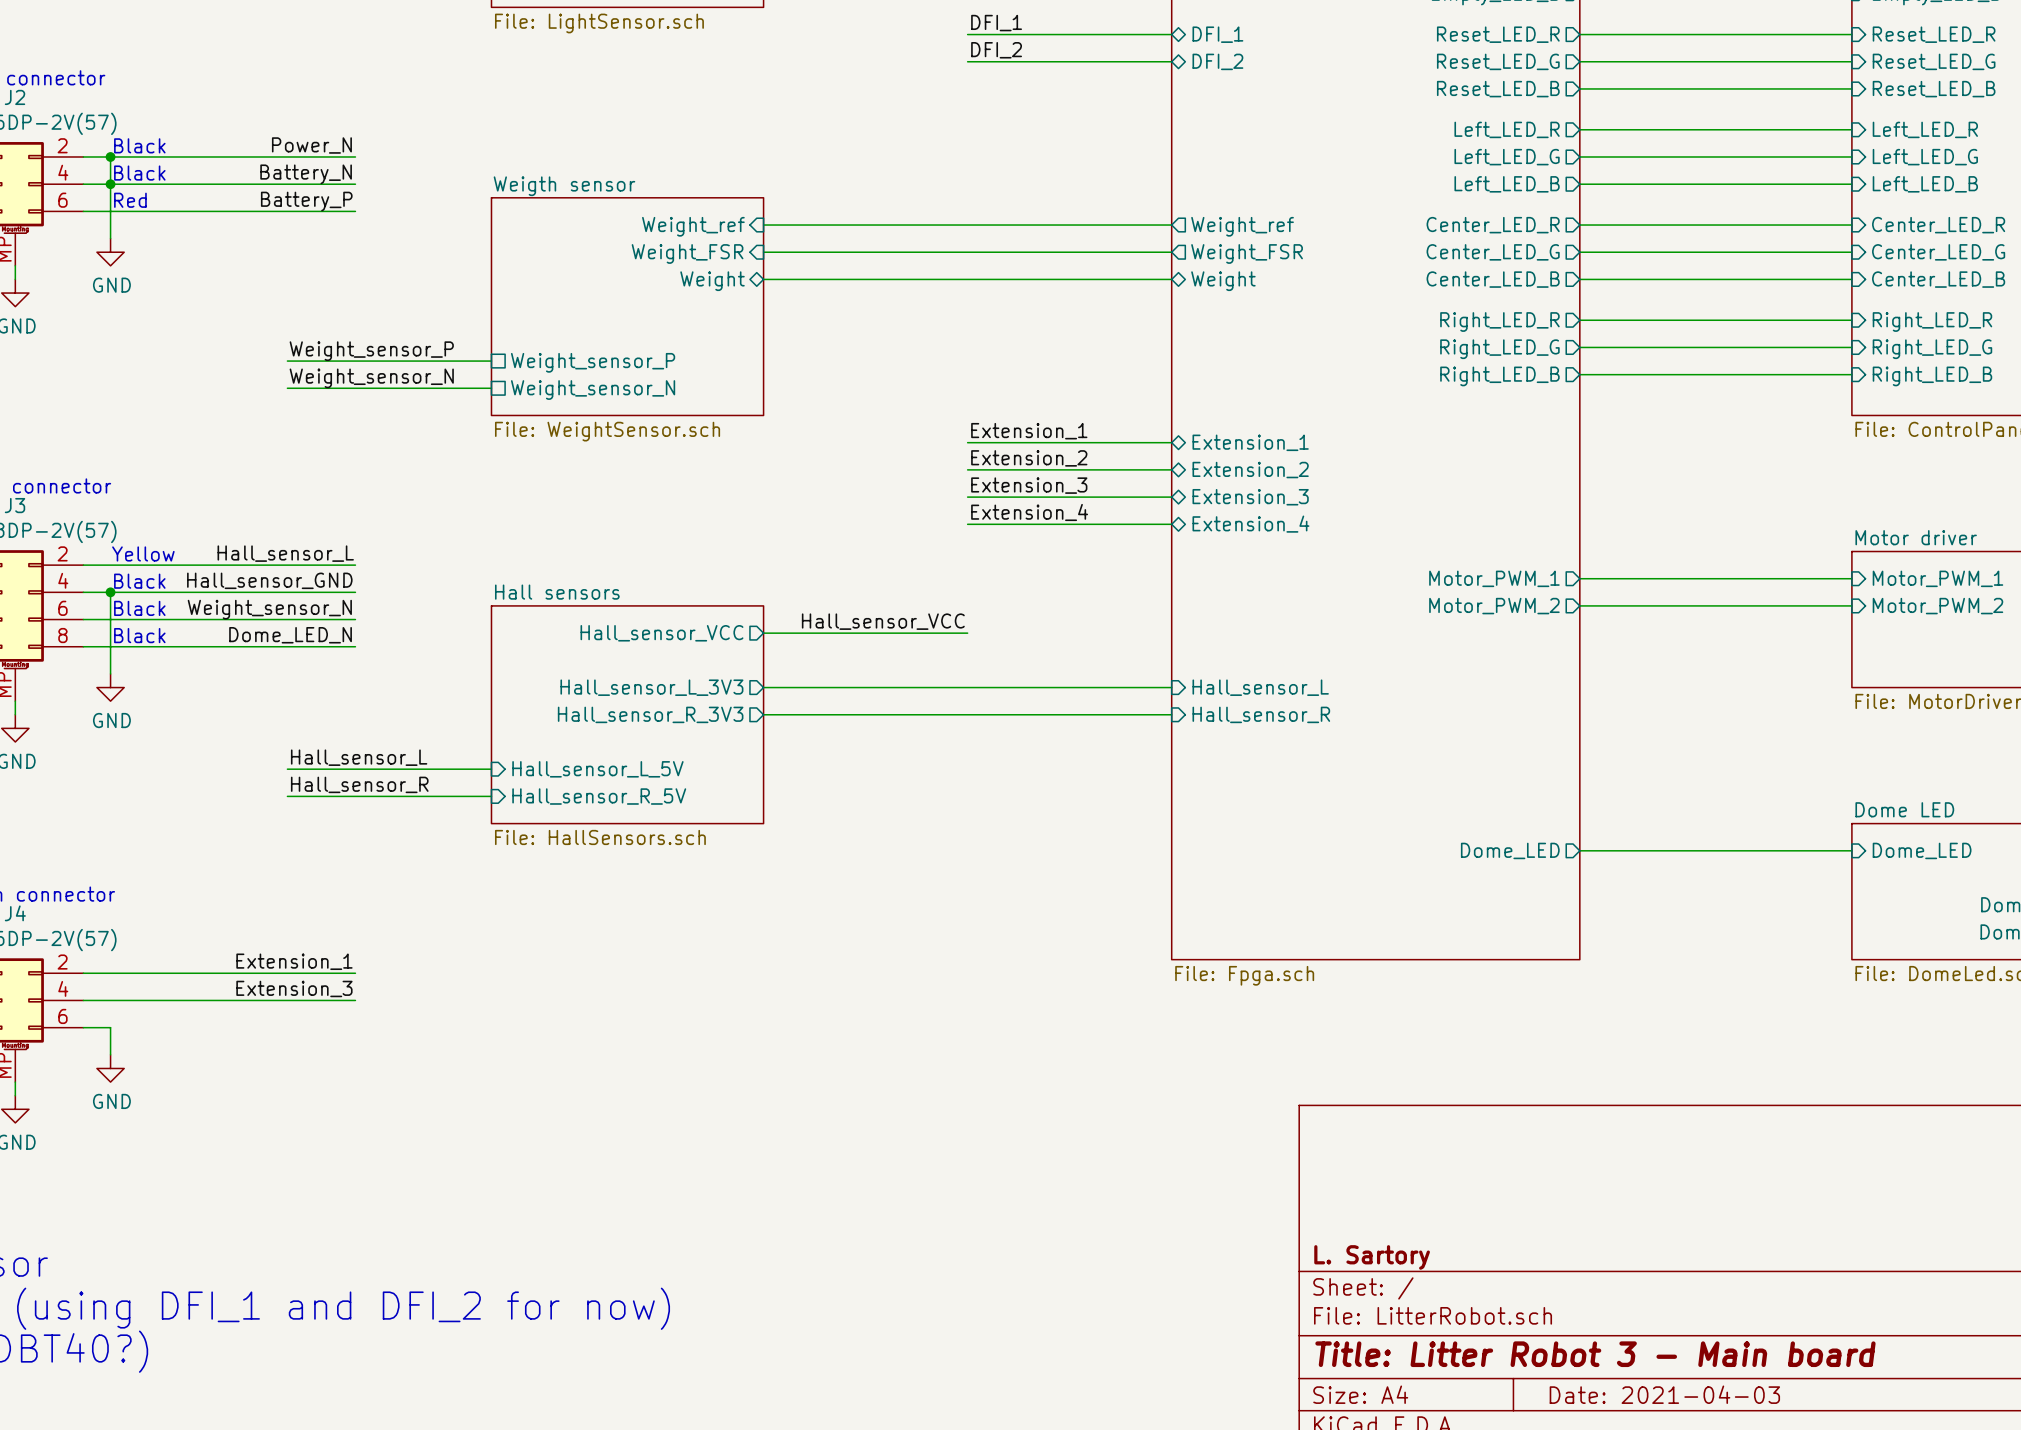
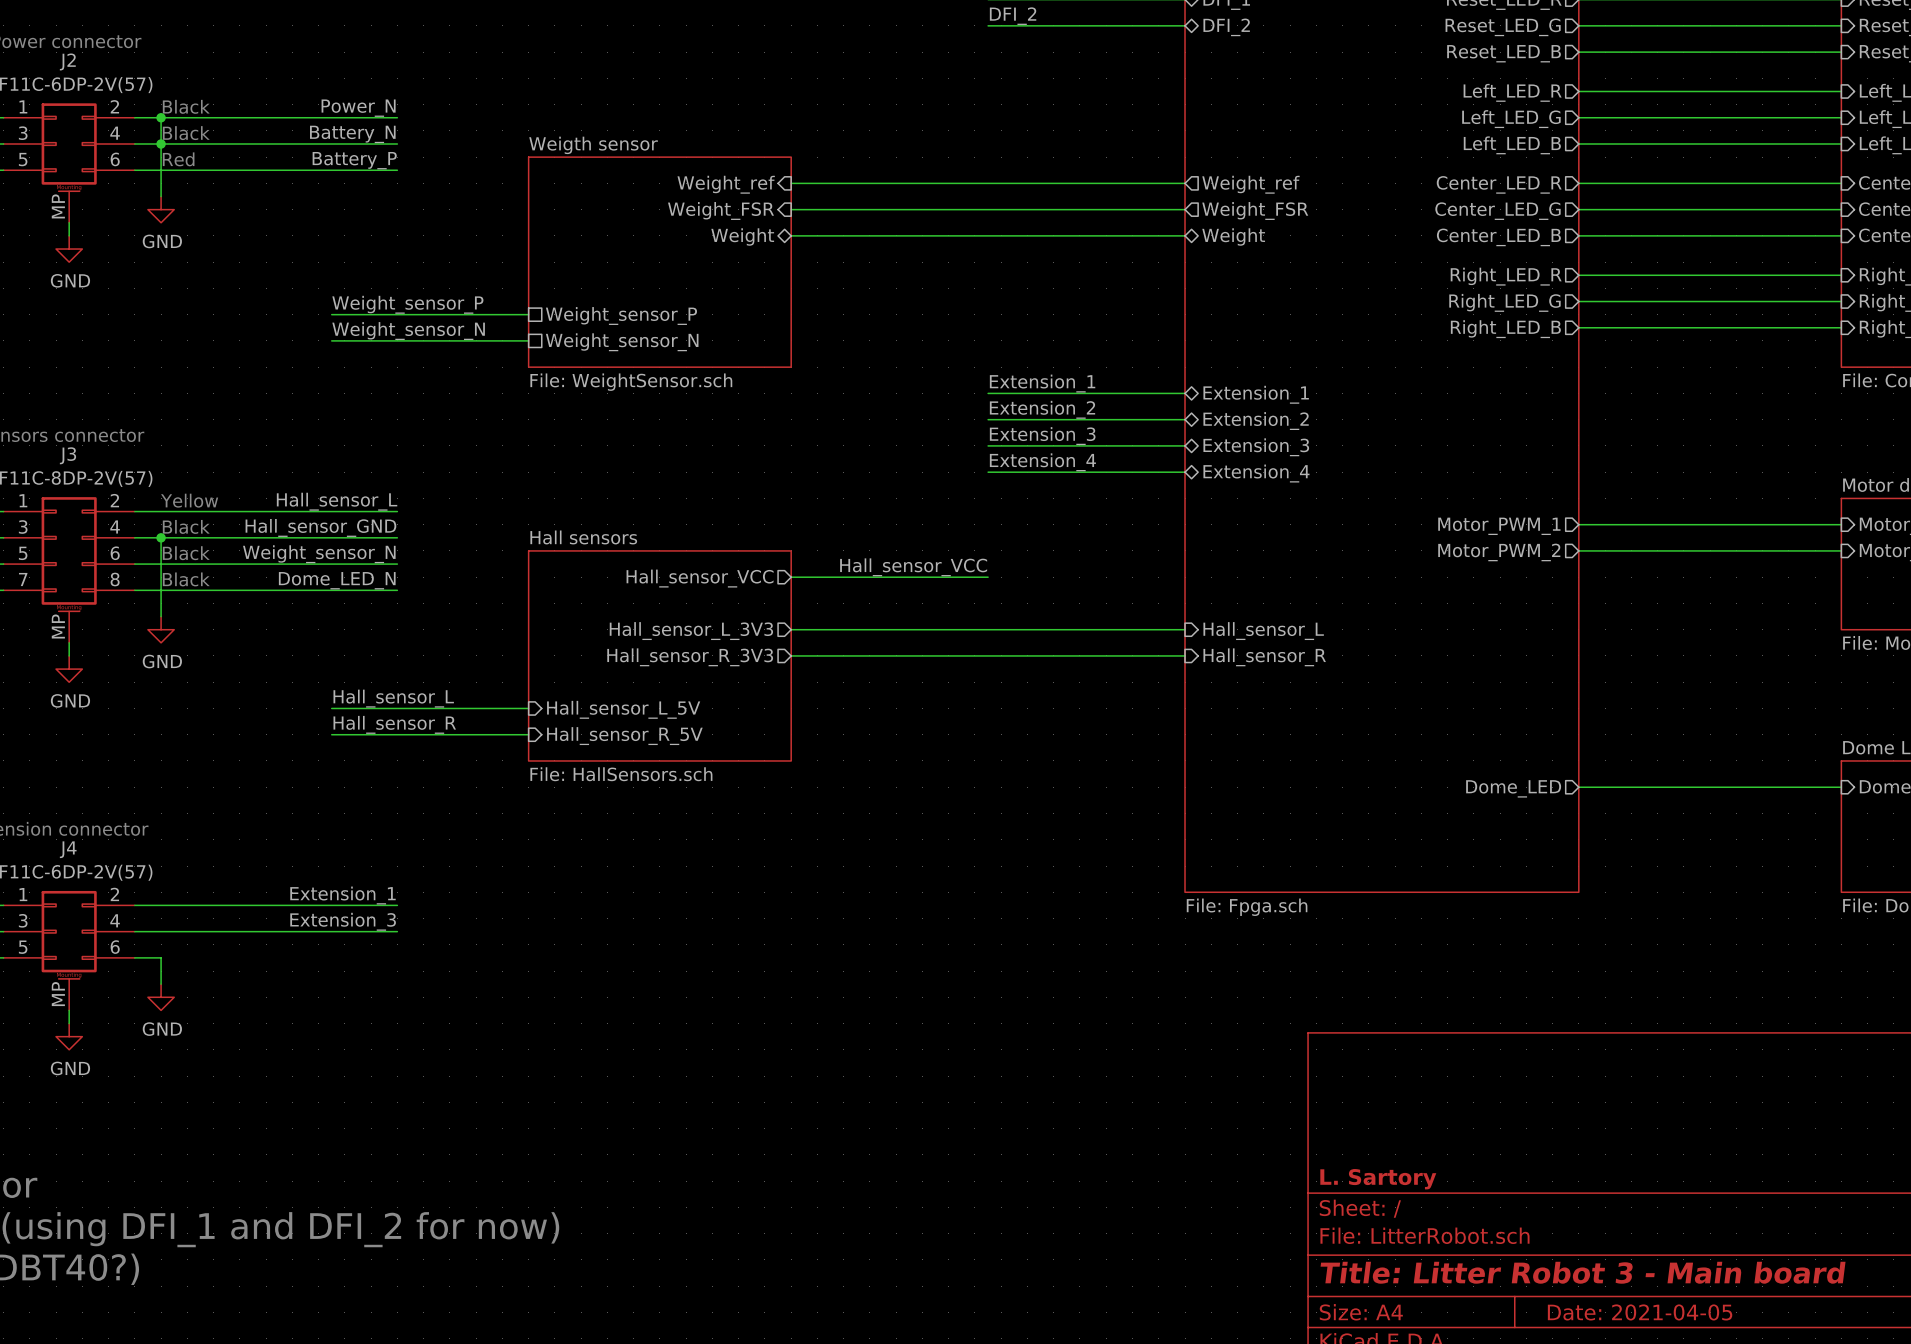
title block: Date: 2021-04-03 (1664, 1394) -> Date: 2021-04-05 (1640, 1312)

